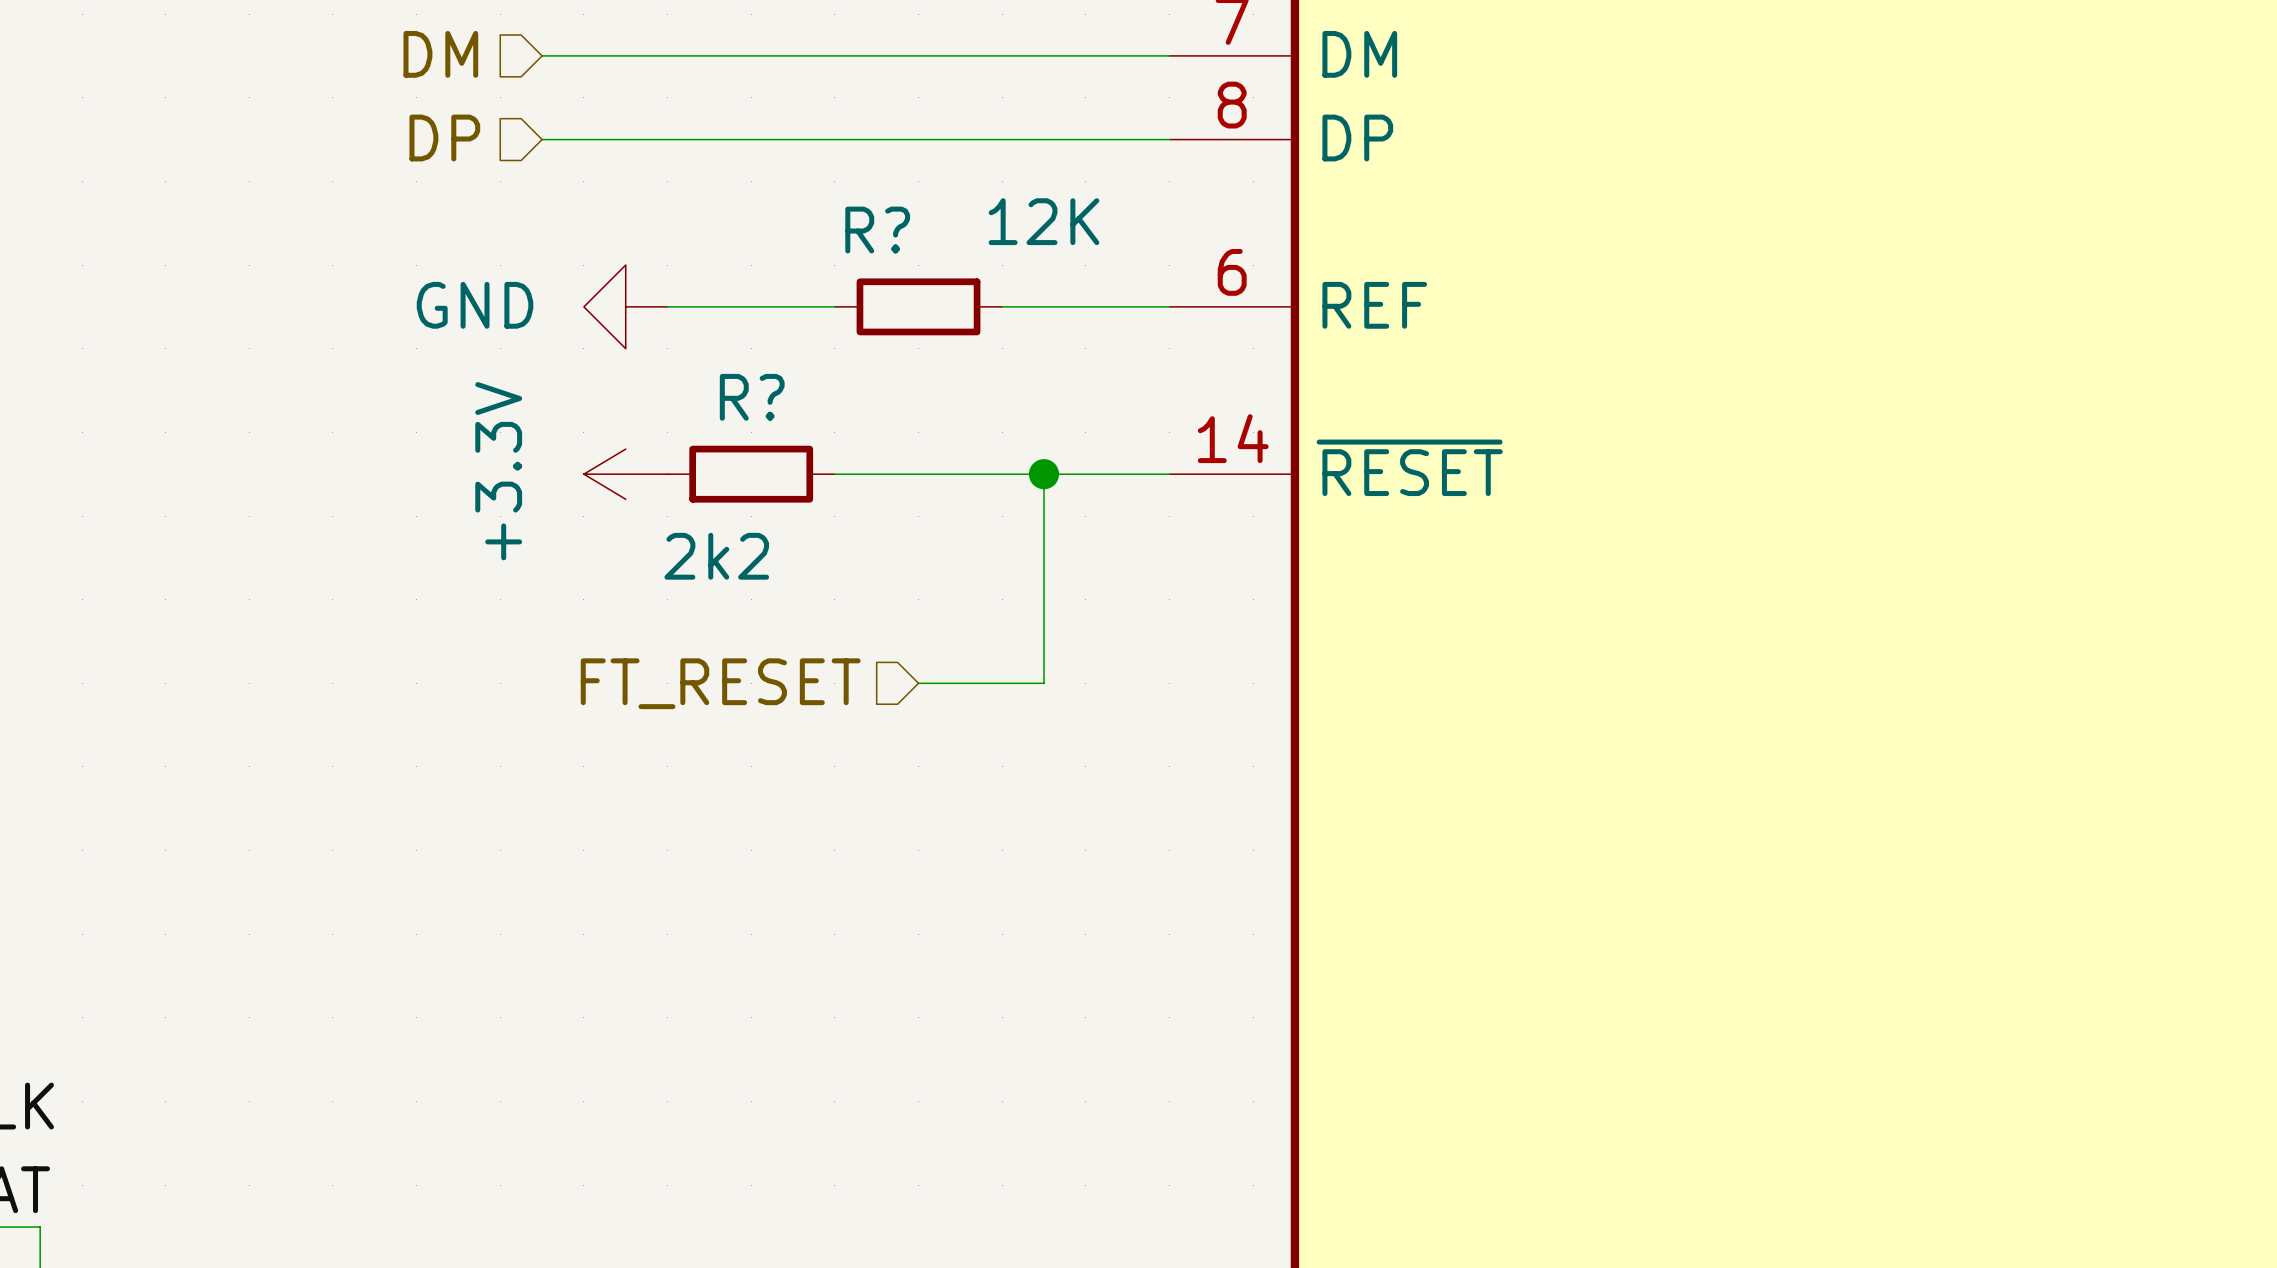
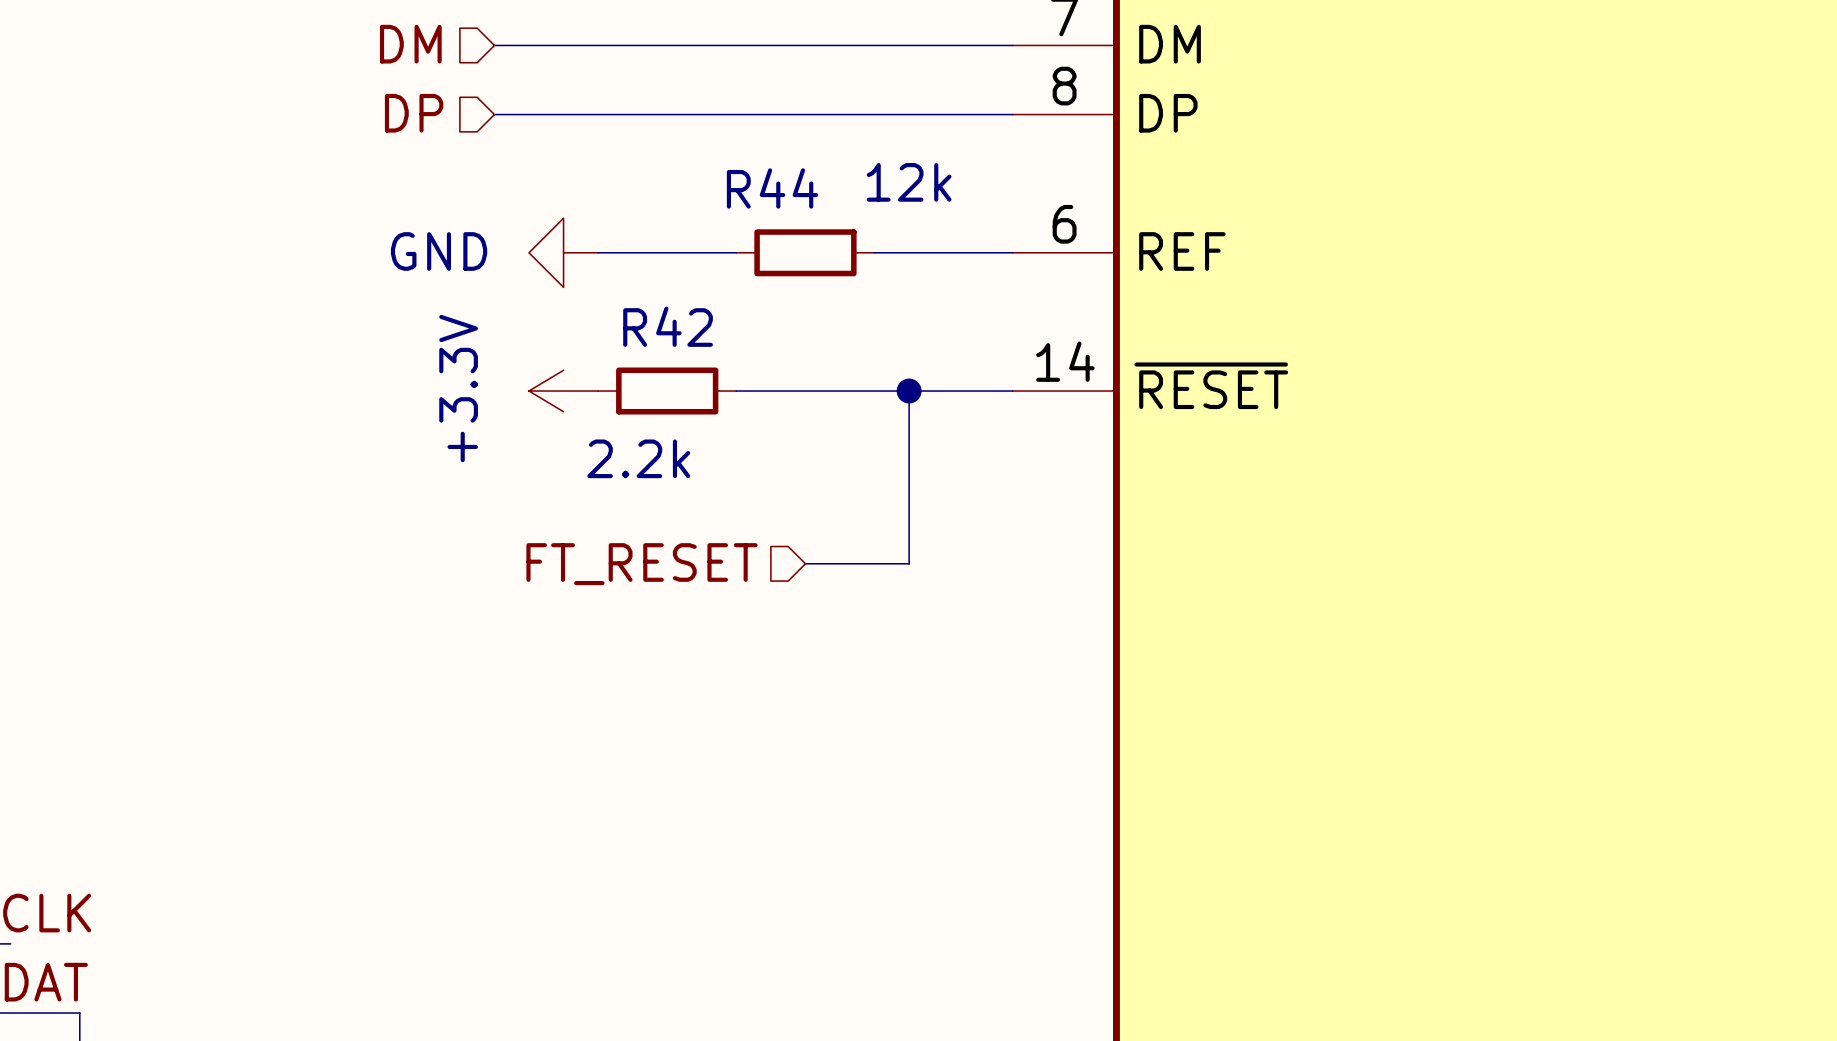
R? value: 12K (1043, 221) -> 12k (909, 182)
R? name: R? (877, 230) -> R44 (772, 188)
R? name: R? (752, 397) -> R42 (668, 326)
R? value: 2k2 (716, 556) -> 2.2k (638, 458)

